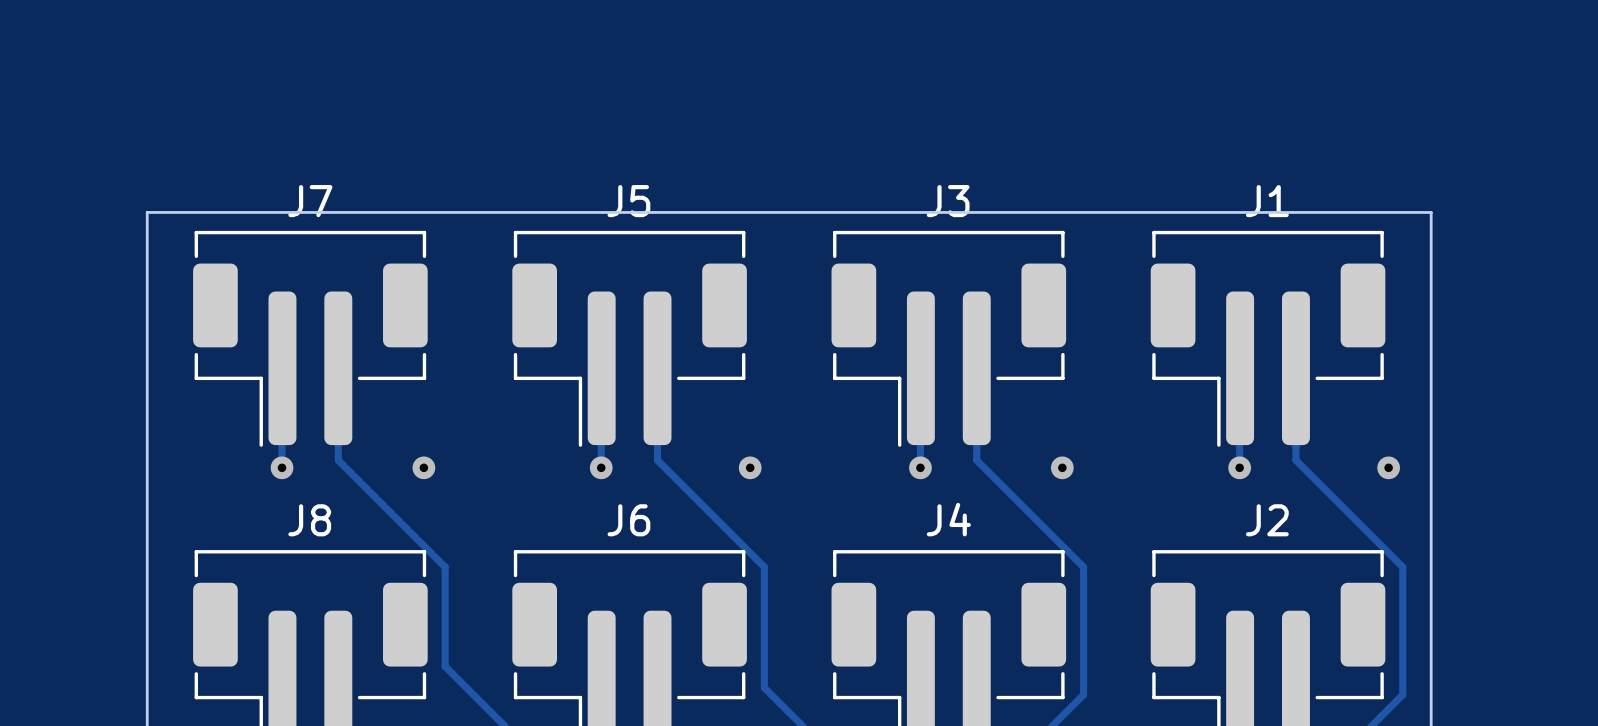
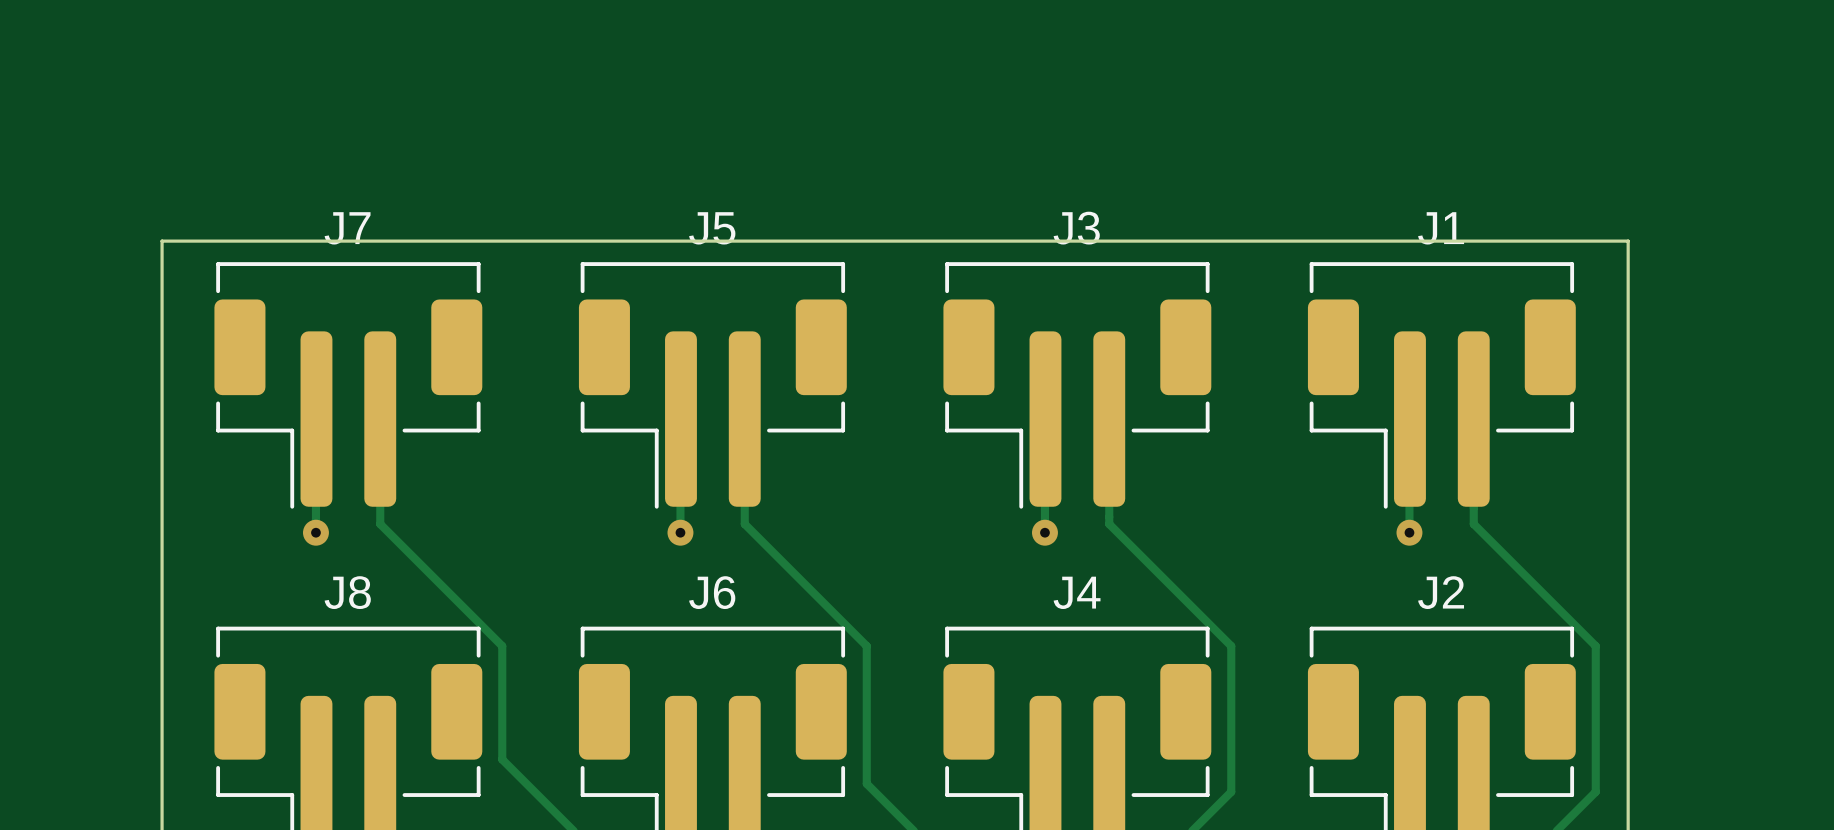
via: (423, 467) -> none
via: (750, 467) -> none
via: (1062, 467) -> none
via: (1388, 467) -> none

